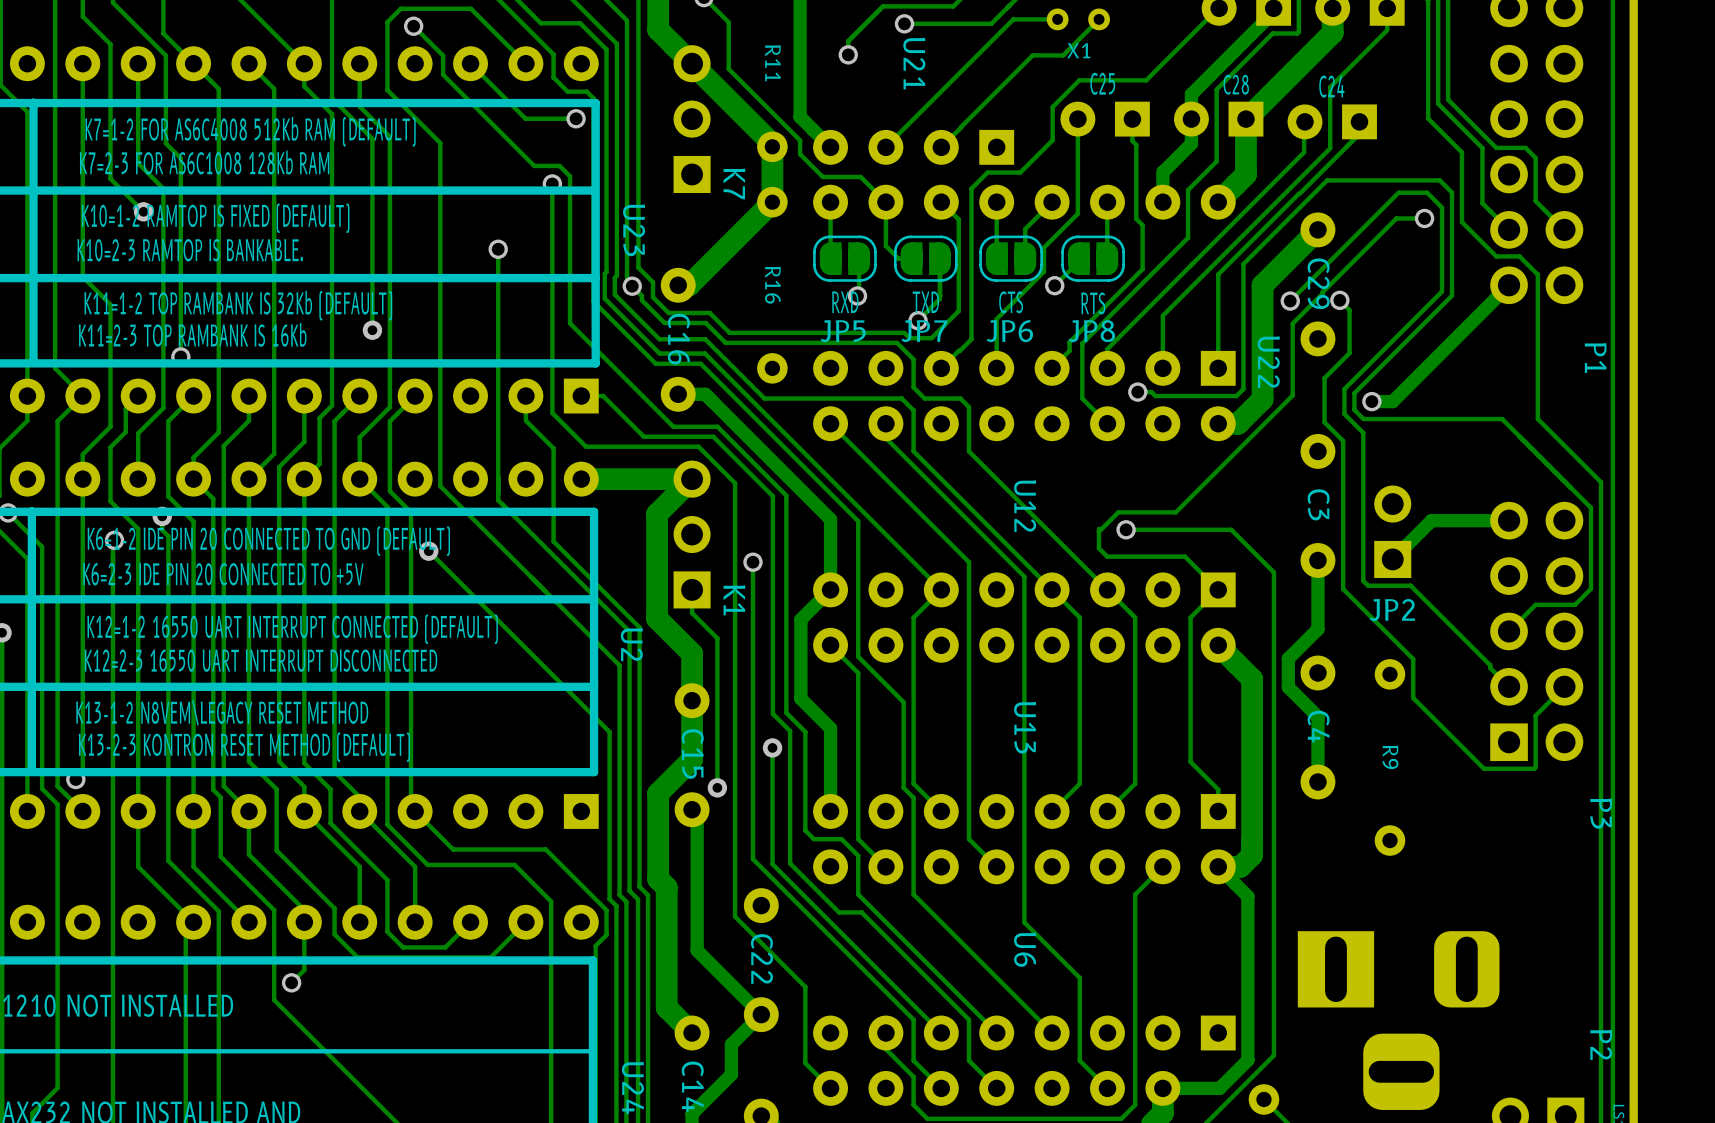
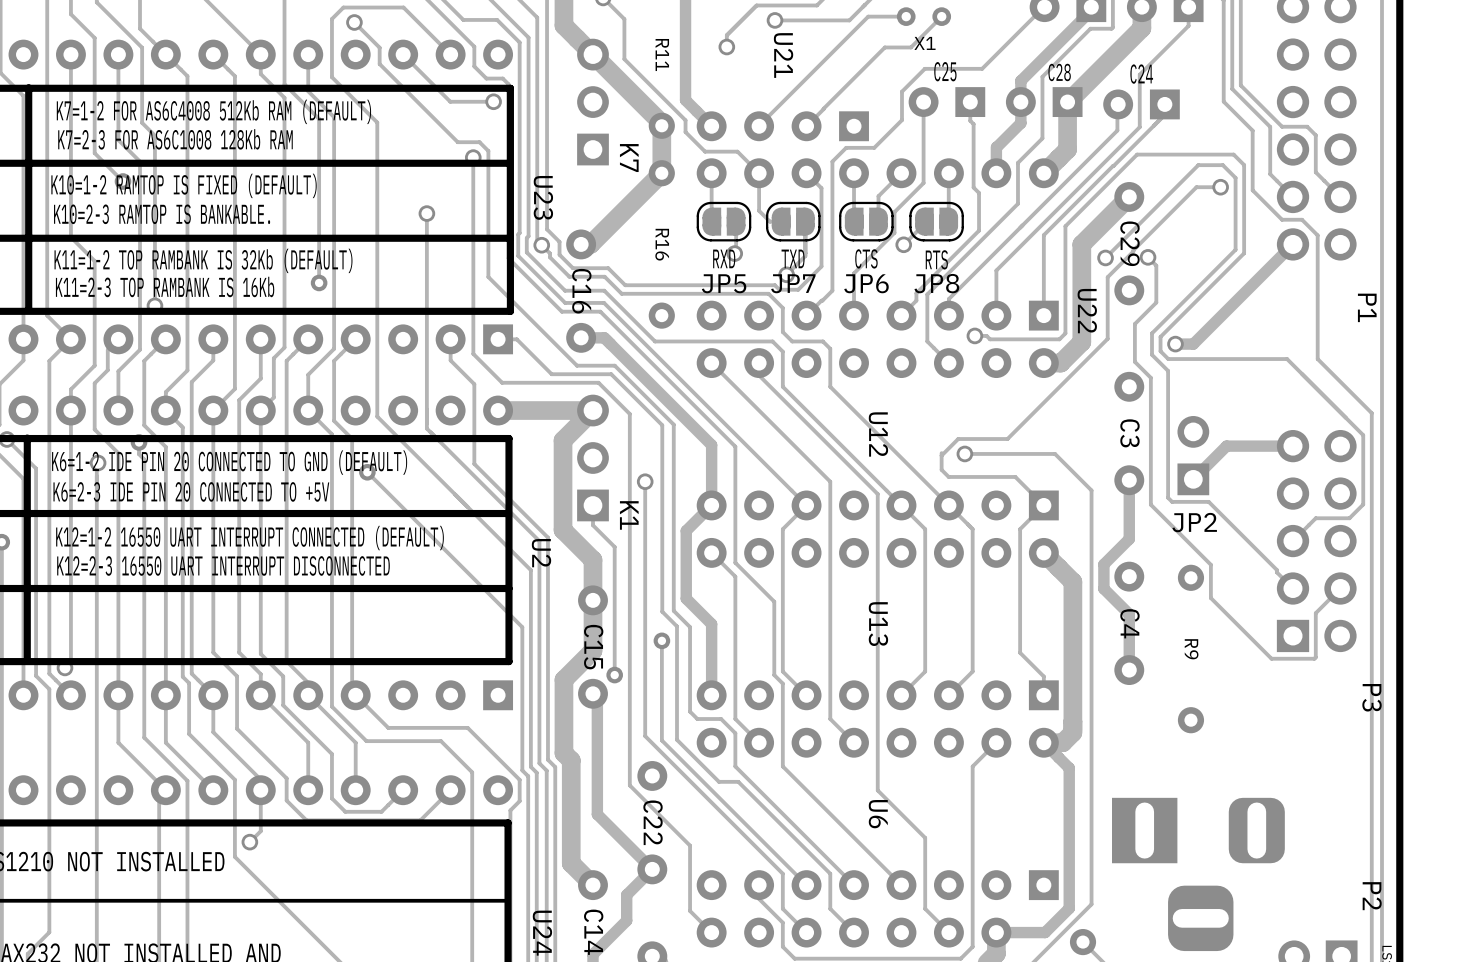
text: K13-1-2 N8VEM\LEGACY RESET METHOD (222, 712) -> none
text: K13-2-3 KONTRON RESET METHOD (DEFAULT) (244, 747) -> none

